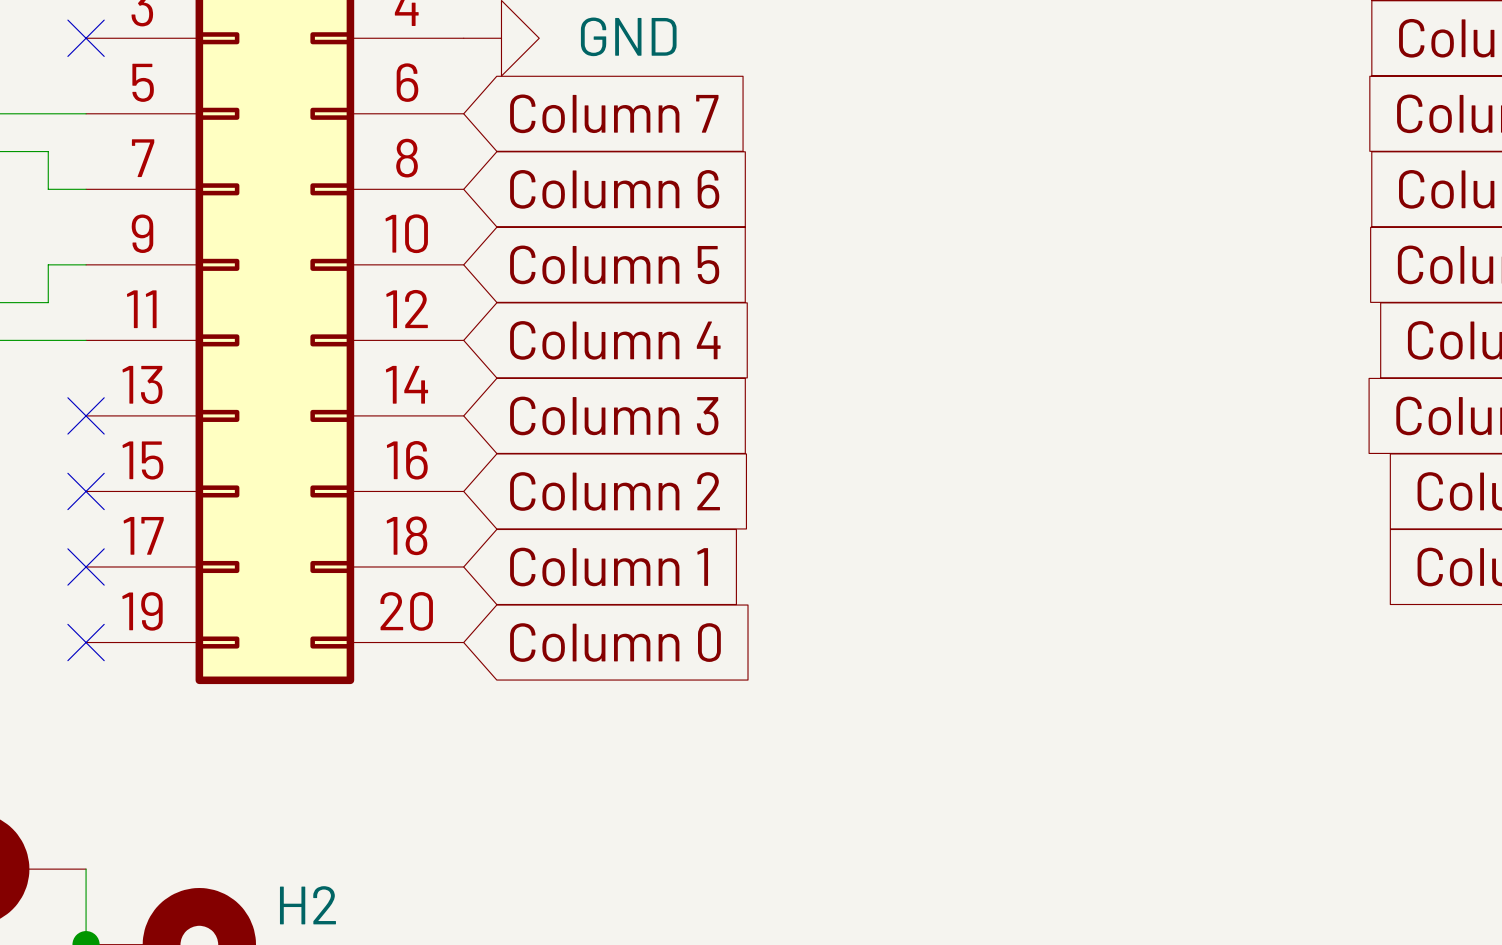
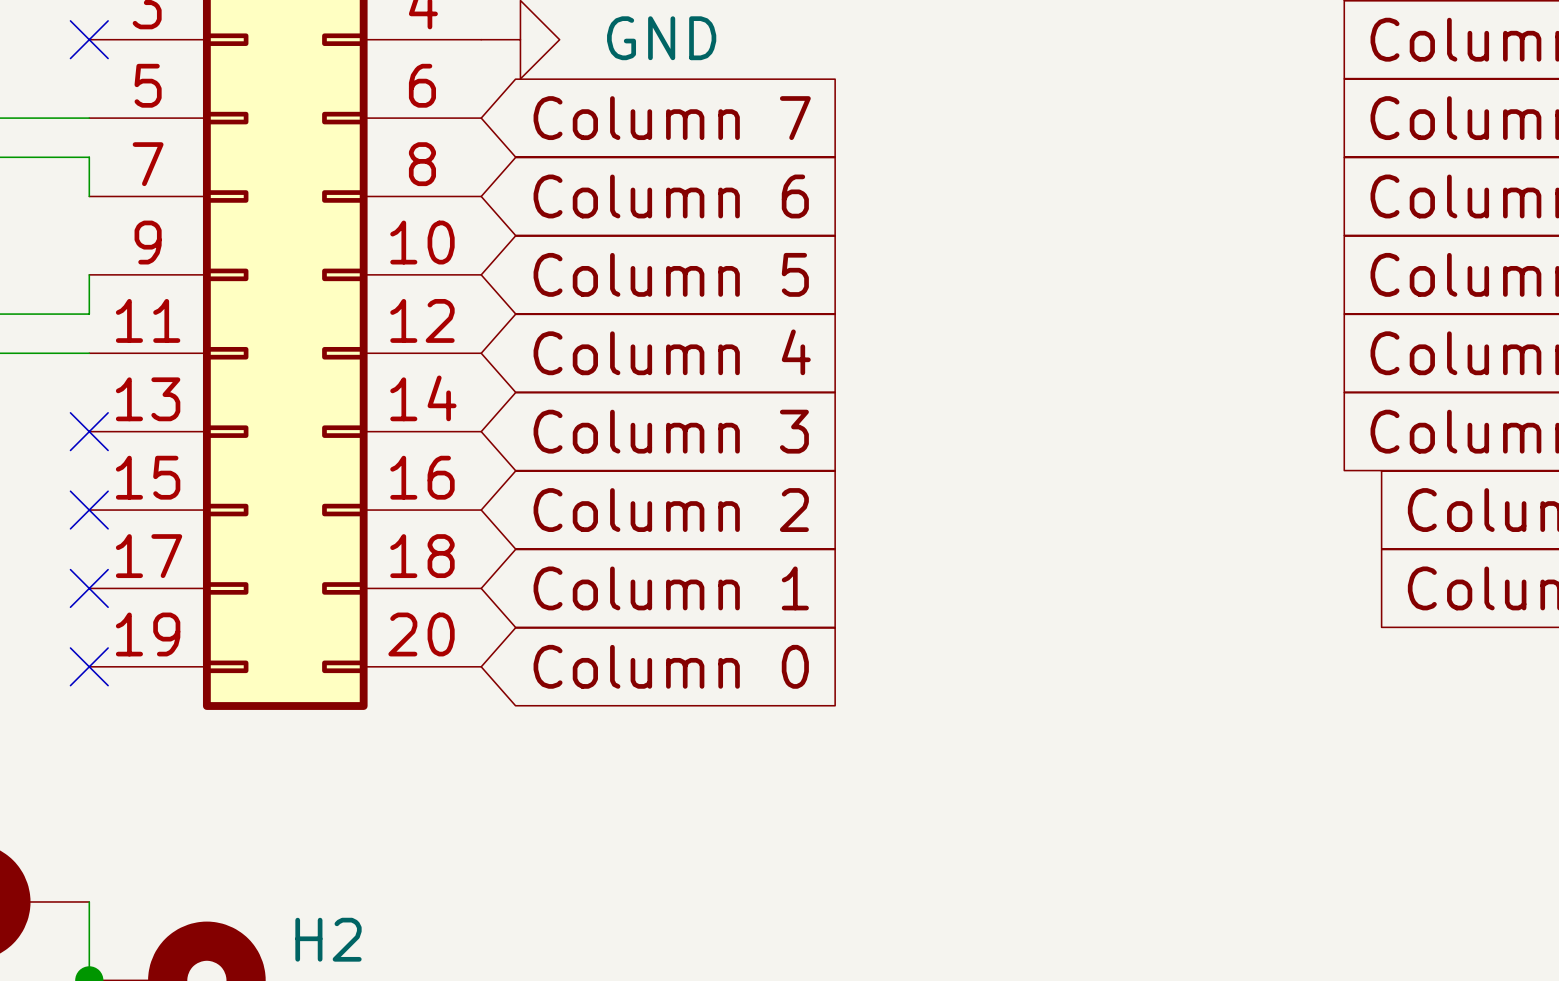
wire: (48, 151) (48, 189) (86, 189) -> (50, 157) (89, 157) (89, 196)
wire: (86, 264) (48, 264) (48, 302) -> (89, 274) (89, 314) (50, 314)

